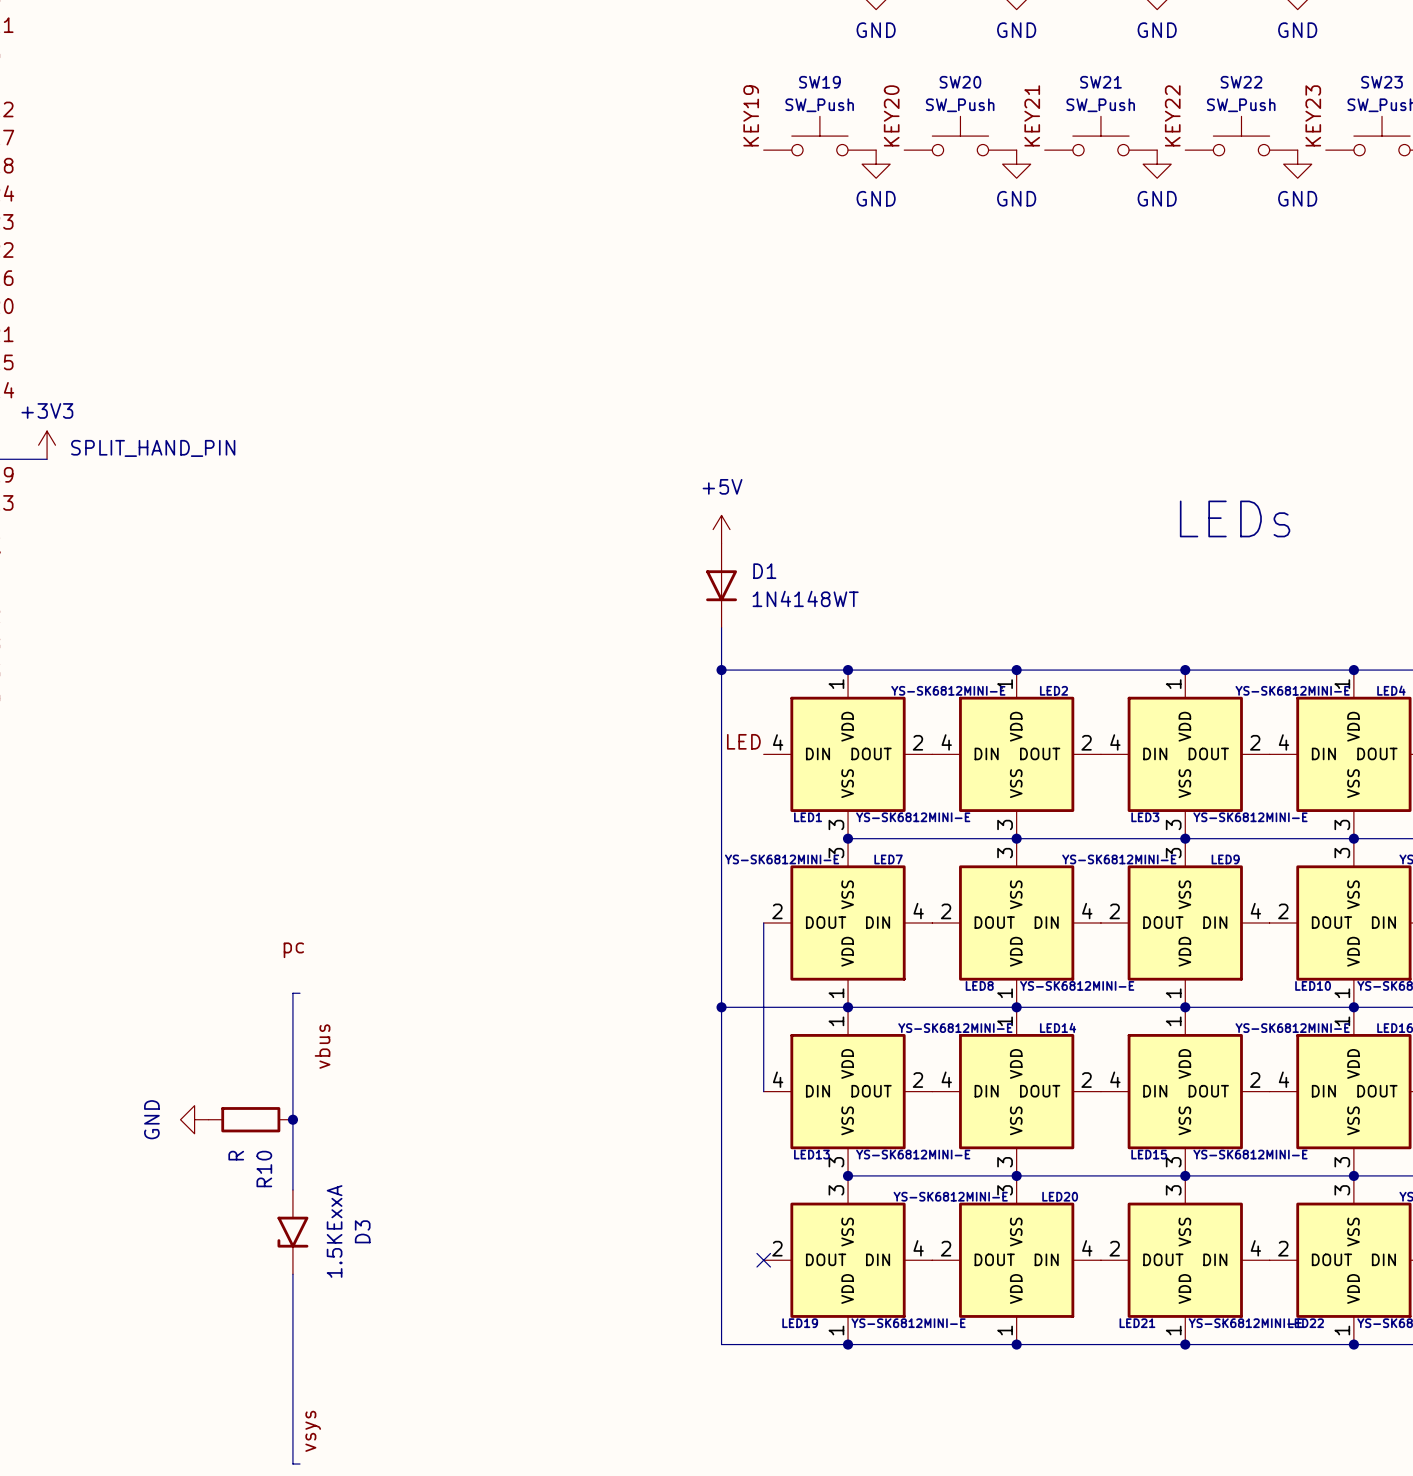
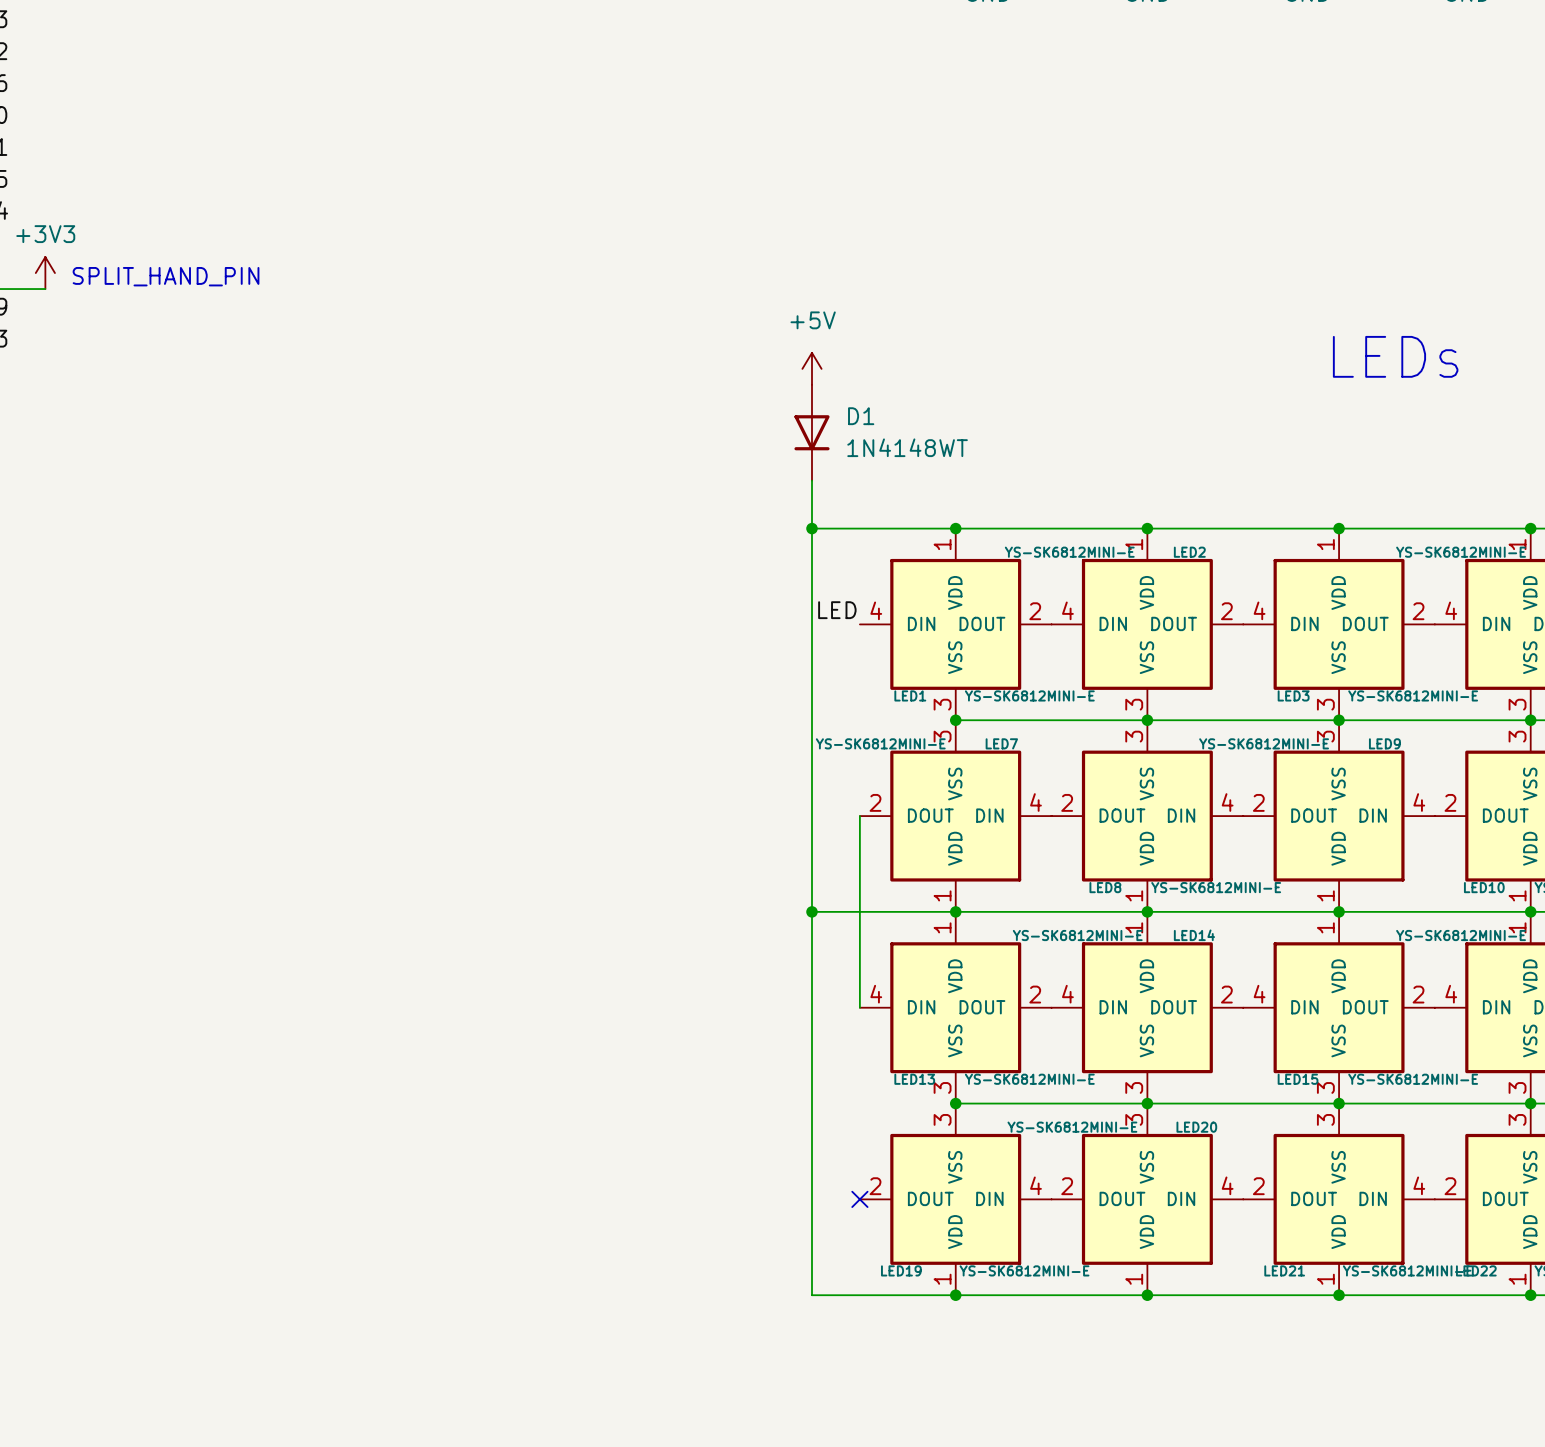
label: pc (293, 950) -> none
wire: (299, 993) (292, 993) (292, 1189) -> none
label: vbus (322, 1046) -> none
power symbol: GND (194, 1119) -> none
R10: R (250, 1119) -> none
junction: (292, 1119) -> none
D3: 1.5KExxA (292, 1232) -> none
wire: (292, 1274) (292, 1464) (299, 1464) -> none
label: vsys (313, 1431) -> none

